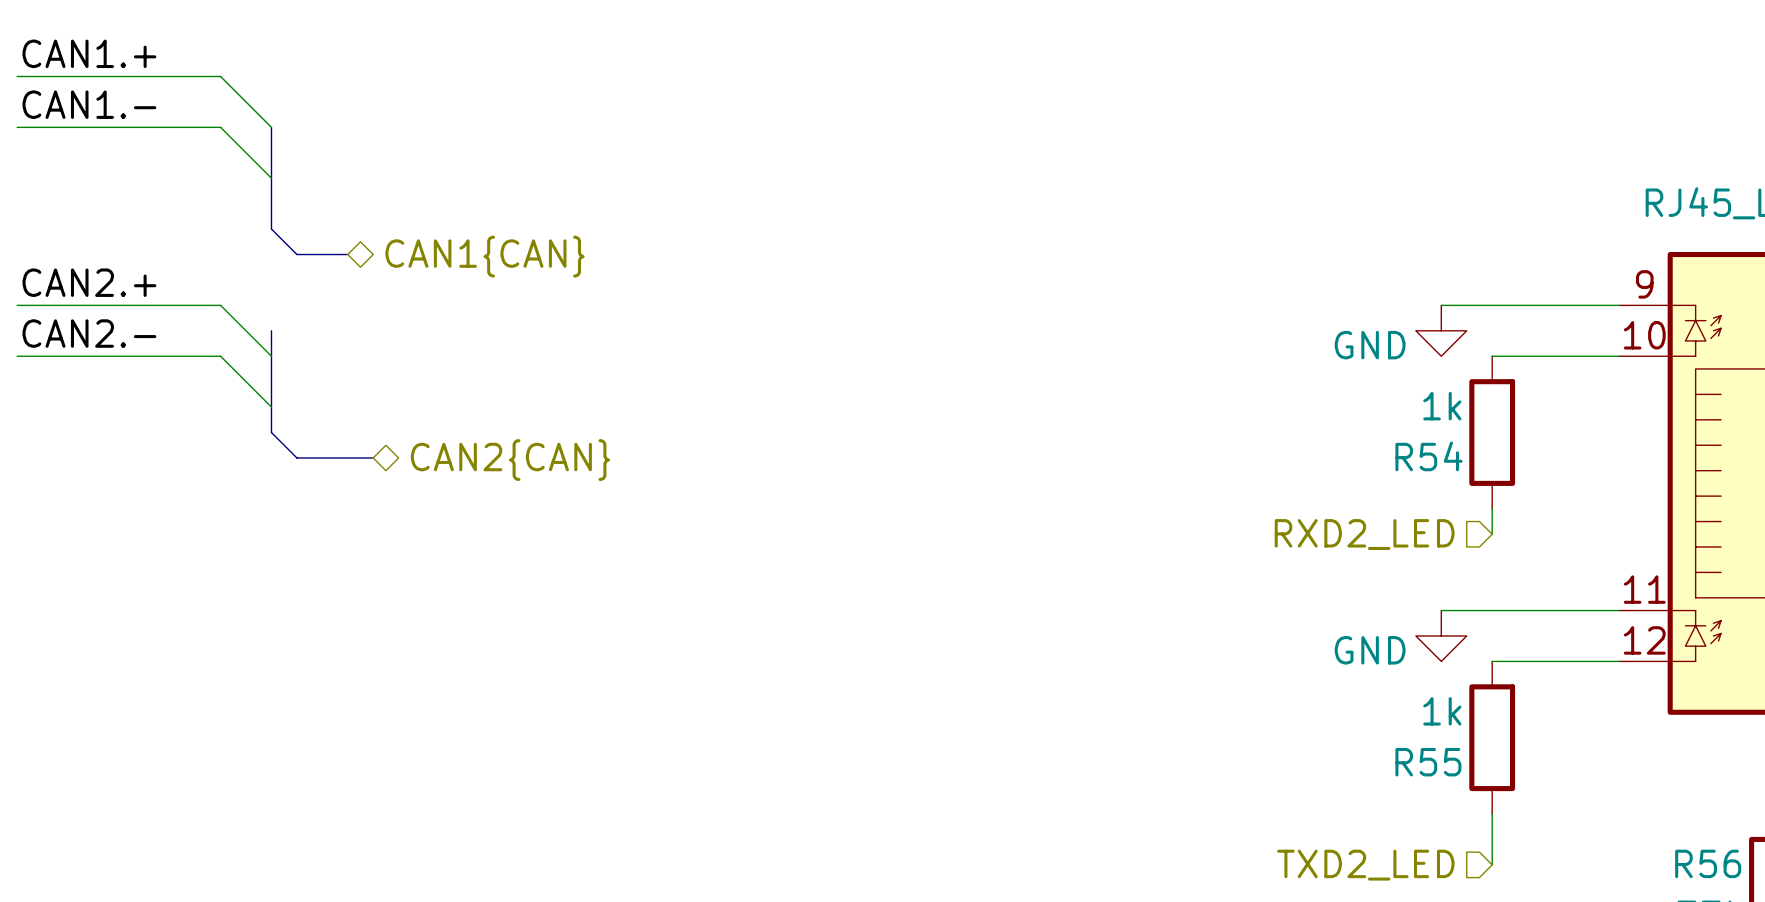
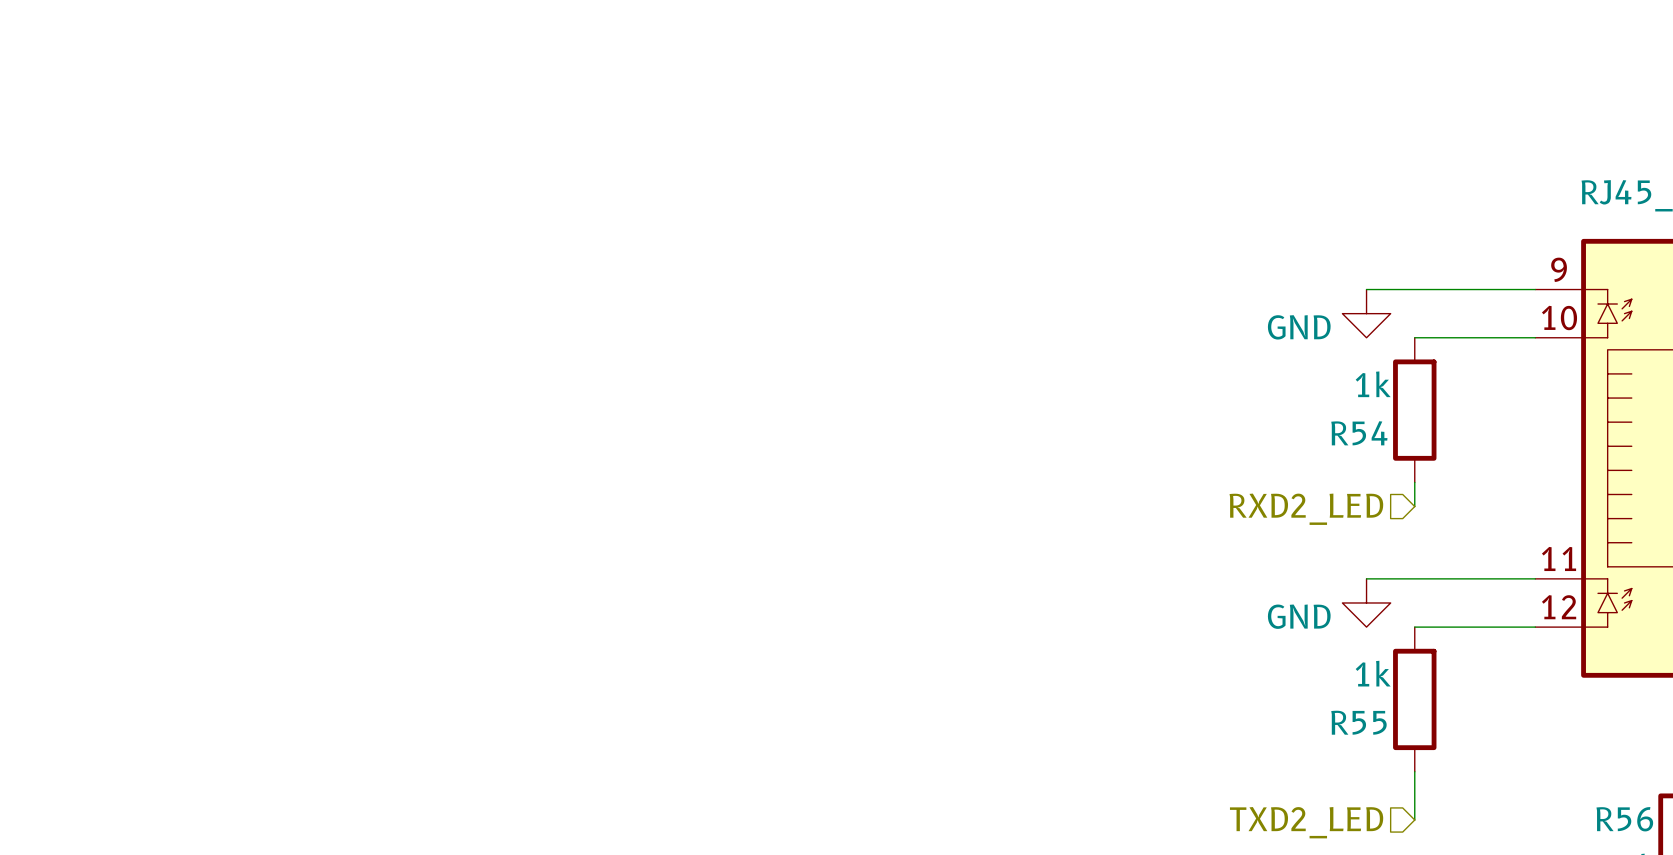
label: CAN1.+ (89, 53) -> none
wire: (17, 76) (220, 76) (271, 127) -> none
label: CAN1.- (89, 104) -> none
wire: (17, 127) (220, 127) (271, 178) -> none
bus: (271, 127) (271, 229) (296, 254) (347, 254) -> none
hierarchical label: CAN1{CAN} (485, 256) -> none
label: CAN2.+ (89, 282) -> none
wire: (17, 305) (220, 305) (271, 356) -> none
bus: (271, 330) (271, 432) (296, 457) (373, 457) -> none
label: CAN2.- (89, 333) -> none
wire: (17, 356) (220, 356) (271, 407) -> none
hierarchical label: CAN2{CAN} (510, 460) -> none

